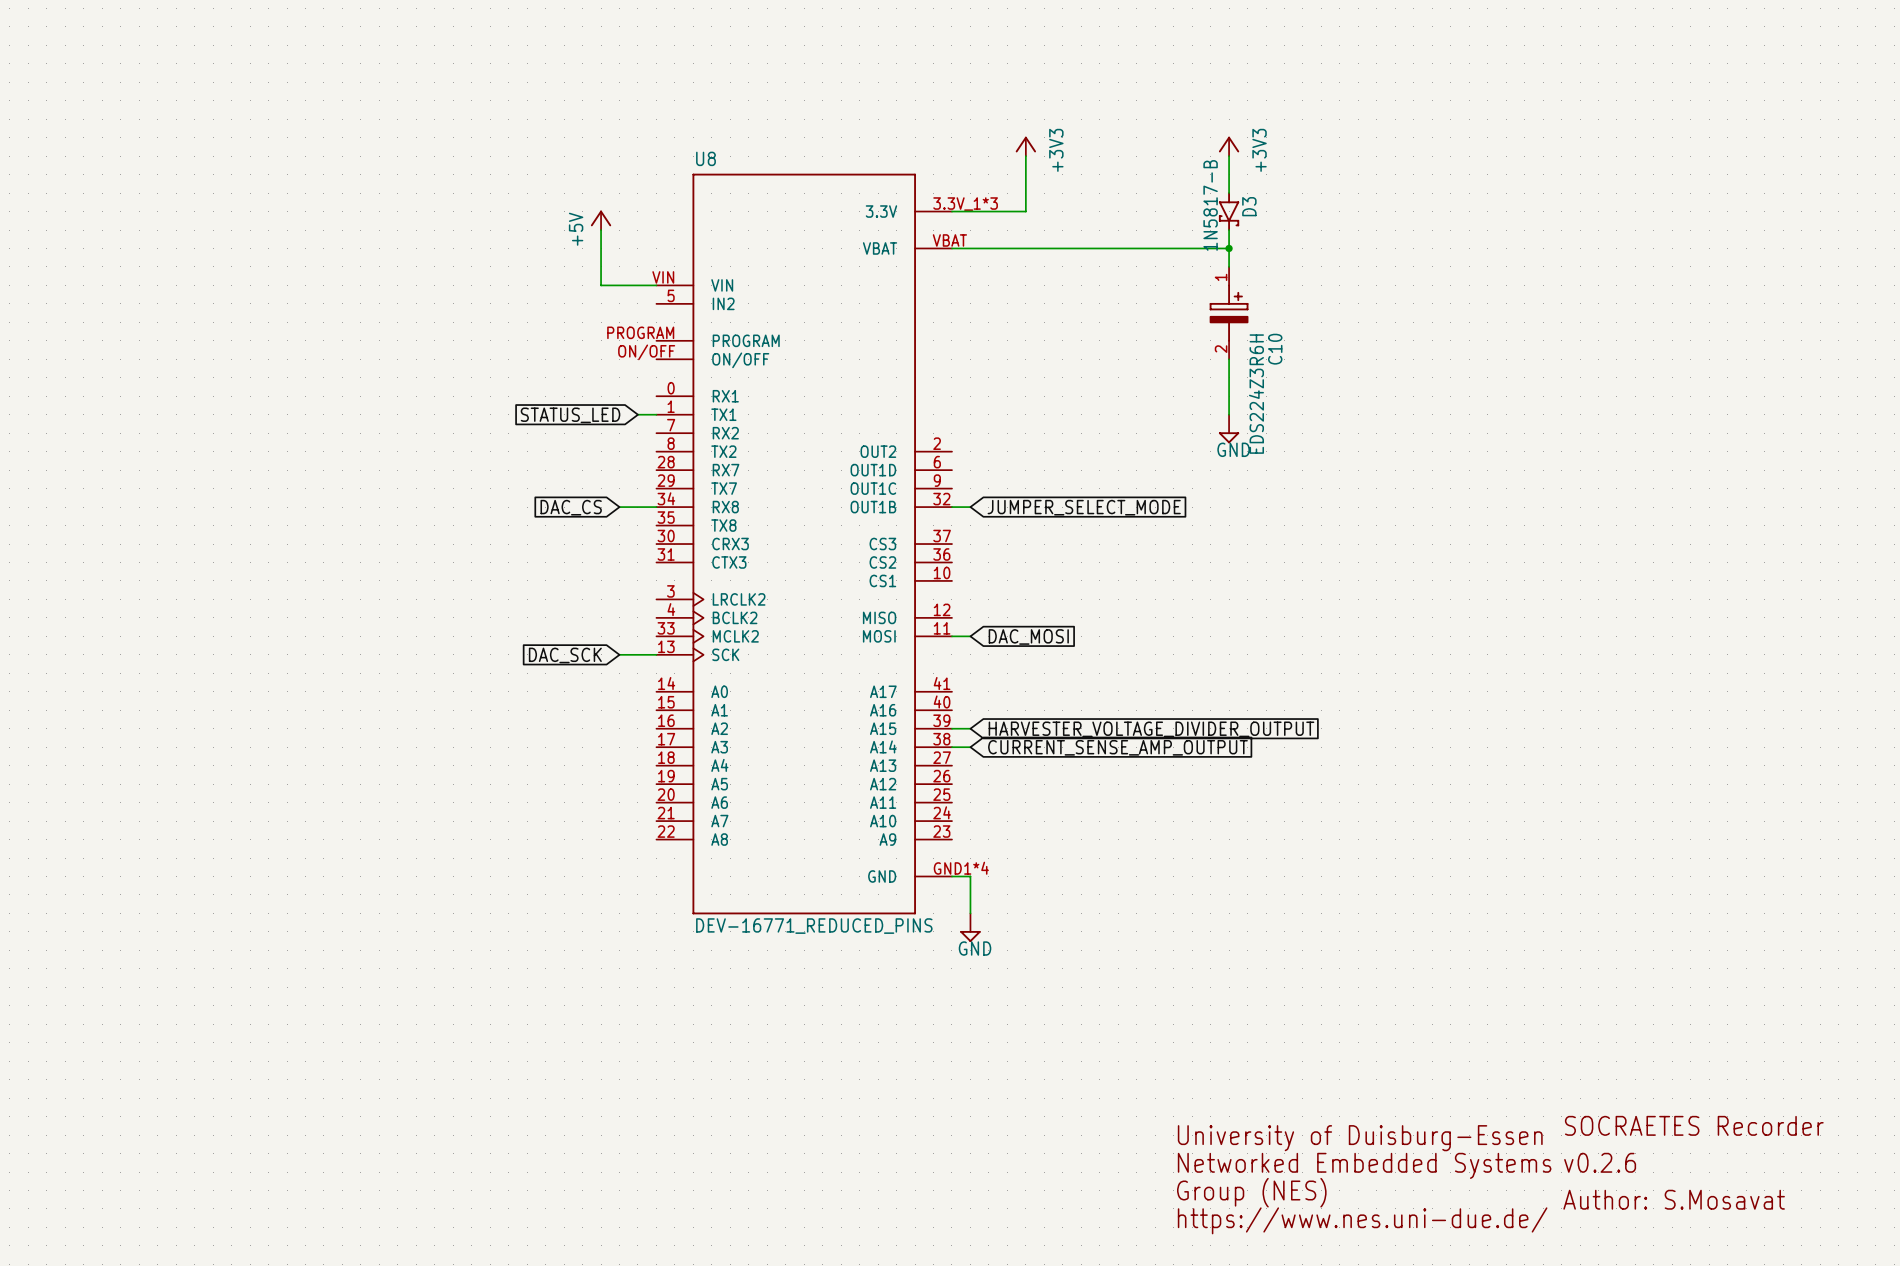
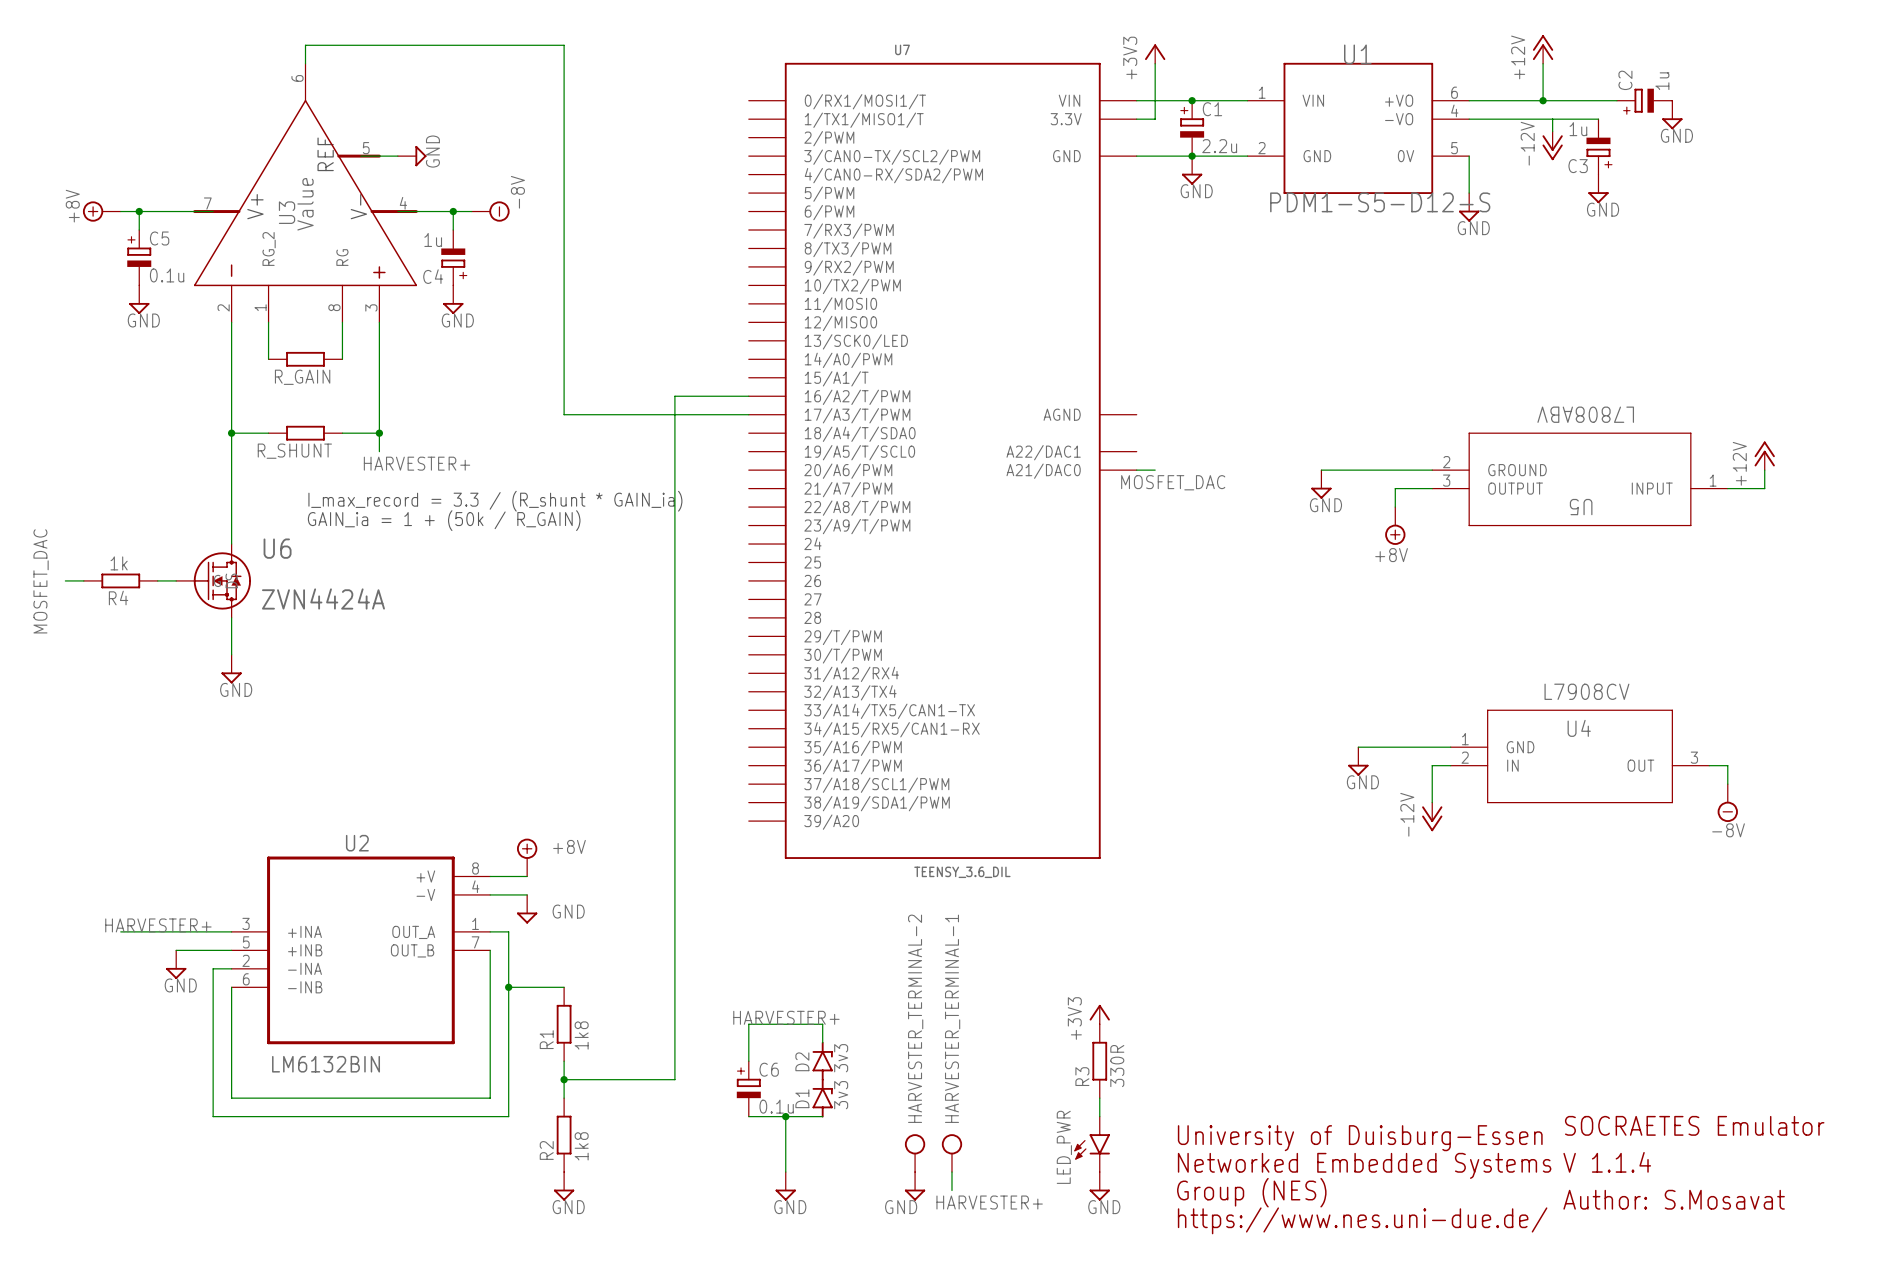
power symbol: none -> +12V (1543, 49)
power symbol: none -> +3V3 (1155, 54)
wire: none -> (305, 63) (305, 45) (564, 45) (564, 414) (637, 414)
wire: none -> (1155, 63) (1155, 119) (1136, 119)
wire: none -> (1543, 63) (1543, 100)
wire: none -> (1136, 100) (1247, 100)
junction: none -> (1192, 100)
wire: none -> (1469, 100) (1616, 100)
junction: none -> (1543, 100)
C2: none -> 1u (1644, 100)
power symbol: none -> GND (1672, 115)
wire: none -> (1469, 119) (1598, 119)
wire: none -> (1552, 119) (1552, 131)
C1: none -> 2.2u (1192, 128)
U1: none -> PDM1-S5-D12-S (1358, 128)
power symbol: none -> -12V (1552, 145)
power symbol: +3V3 (1025, 146) -> none
power symbol: +3V3 (1229, 146) -> none
C3: none -> 1u (1598, 146)
wire: none -> (360, 156) (397, 156)
power symbol: none -> GND (412, 156)
wire: (1025, 156) (1025, 211) (951, 211) -> none
wire: none -> (1136, 156) (1247, 156)
junction: none -> (1192, 156)
wire: (1229, 156) (1229, 193) -> none
wire: none -> (1469, 156) (1469, 193)
power symbol: none -> GND (1192, 170)
power symbol: none -> GND (1598, 188)
U3: none -> Value (305, 193)
power symbol: none -> GND (1469, 207)
power symbol: none -> +8V (101, 211)
wire: none -> (120, 211) (213, 211)
wire: none -> (139, 211) (139, 230)
junction: none -> (139, 211)
wire: none -> (397, 211) (471, 211)
wire: none -> (453, 211) (453, 230)
junction: none -> (453, 211)
power symbol: none -> -8V (490, 211)
D3: 1N5817-B (1229, 211) -> none
power symbol: +5V (601, 220) -> none
wire: (601, 230) (601, 285) (656, 285) -> none
wire: (1229, 230) (1229, 266) -> none
wire: (951, 248) (1229, 248) -> none
junction: (1229, 248) -> none
C5: none -> 0.1u (139, 257)
C4: none -> 1u (453, 257)
power symbol: none -> GND (139, 299)
power symbol: none -> GND (453, 299)
C10: EDS224Z3R6H (1229, 313) -> none
wire: none -> (231, 322) (231, 544)
wire: none -> (268, 322) (268, 359)
wire: none -> (342, 322) (342, 359)
wire: none -> (379, 322) (379, 451)
R_GAIN: none -> (305, 359)
wire: (1229, 359) (1229, 414) -> none
wire: none -> (748, 396) (674, 396) (674, 1079) (564, 1079)
wire: none -> (656, 414) (748, 414)
global label: STATUS_LED (570, 415) -> none
power symbol position: GND (1229, 429) -> GND (1321, 484)
wire: none -> (231, 433) (268, 433)
junction: none -> (231, 433)
R_SHUNT: none -> (305, 433)
wire: none -> (342, 433) (379, 433)
junction: none -> (379, 433)
power symbol: none -> +12V (1764, 455)
U7: none -> TEENSY_3.6_DIL (942, 460)
label: none -> HARVESTER+ (417, 463)
wire: none -> (1136, 470) (1155, 470)
wire: none -> (1321, 470) (1432, 470)
wire: none -> (1764, 470) (1764, 488) (1727, 488)
U5: none -> L7808ABV (1580, 479)
label: none -> MOSFET_DAC (1173, 482)
wire: none -> (1432, 488) (1395, 488) (1395, 507)
text: none -> I_max_record = 3.3 / (R_shunt * GAIN_ia) (495, 501)
global label: DAC_CS (571, 507) -> none
wire: (619, 507) (656, 507) -> none
wire: (951, 507) (970, 507) -> none
global label: JUMPER_SELECT_MODE (1084, 507) -> none
text: none -> GAIN_ia = 1 + (50k / R_GAIN) (444, 520)
power symbol: none -> +8V (1395, 526)
U8: DEV-16771_REDUCED_PINS (804, 544) -> none
wire: none -> (65, 580) (83, 580)
R4: none -> 1k (120, 580)
wire: none -> (157, 580) (176, 580)
U6: none -> ZVN4424A (213, 580)
label: none -> MOSFET_DAC (41, 581)
wire: none -> (231, 617) (231, 654)
wire: (951, 636) (970, 636) -> none
global label: DAC_MOSI (1028, 636) -> none
wire: (619, 654) (656, 654) -> none
global label: DAC_SCK (565, 655) -> none
power symbol: none -> GND (231, 669)
wire: (951, 728) (970, 728) -> none
global label: HARVESTER_VOLTAGE_DIVIDER_OUTPUT (1151, 729) -> none
wire: (951, 747) (970, 747) -> none
global label: CURRENT_SENSE_AMP_OUTPUT (1117, 747) -> none
wire: none -> (1358, 747) (1450, 747)
U4: none -> L7908CV (1580, 756)
power symbol: none -> GND (1358, 761)
wire: none -> (1450, 765) (1432, 765) (1432, 802)
wire: none -> (1709, 765) (1727, 765) (1727, 784)
power symbol: none -> -8V (1727, 803)
power symbol: none -> -12V (1432, 816)
power symbol: none -> +8V (527, 857)
wire: none -> (490, 876) (527, 876)
wire: (951, 876) (970, 876) (970, 913) -> none
wire: none -> (490, 894) (527, 894)
power symbol: none -> GND (527, 909)
label: none -> HARVESTER+ (158, 925)
power symbol: GND (970, 927) -> none
wire: none -> (120, 931) (231, 931)
wire: none -> (490, 931) (508, 931) (508, 1116) (213, 1116) (213, 968) (231, 968)
wire: none -> (176, 950) (231, 950)
U2: none -> LM6132BIN (360, 950)
wire: none -> (490, 950) (490, 1098) (231, 1098) (231, 987)
power symbol: none -> GND (176, 964)
wire: none -> (508, 987) (564, 987)
junction: none -> (508, 987)
power symbol: none -> +3V3 (1099, 1014)
label: none -> HARVESTER+ (786, 1017)
R1: none -> 1k8 (564, 1024)
wire: none -> (822, 1042) (822, 1024) (748, 1024) (748, 1061)
wire: none -> (564, 1061) (564, 1098)
D2: none -> 3v3 (822, 1061)
R3: none -> 330R (1099, 1061)
junction: none -> (564, 1079)
C6: none -> 0.1u (748, 1088)
D1: none -> 3v3 (822, 1098)
wire: none -> (1099, 1098) (1099, 1116)
wire: none -> (748, 1116) (822, 1116)
wire: none -> (785, 1116) (785, 1172)
junction: none -> (785, 1116)
text: SOCRAETES Recorder (1694, 1125) -> SOCRAETES Emulator (1694, 1125)
R2: none -> 1k8 (564, 1135)
LED_PWR: none -> (1092, 1144)
HARVESTER_TERMINAL-2: none -> (915, 1153)
HARVESTER_TERMINAL-1: none -> (951, 1153)
text: v0.2.6 (1600, 1162) -> V 1.1.4 (1607, 1162)
wire: none -> (951, 1172) (951, 1190)
power symbol: none -> GND (564, 1186)
power symbol: none -> GND (785, 1186)
power symbol: none -> GND (915, 1186)
power symbol: none -> GND (1099, 1186)
label: none -> HARVESTER+ (989, 1202)

